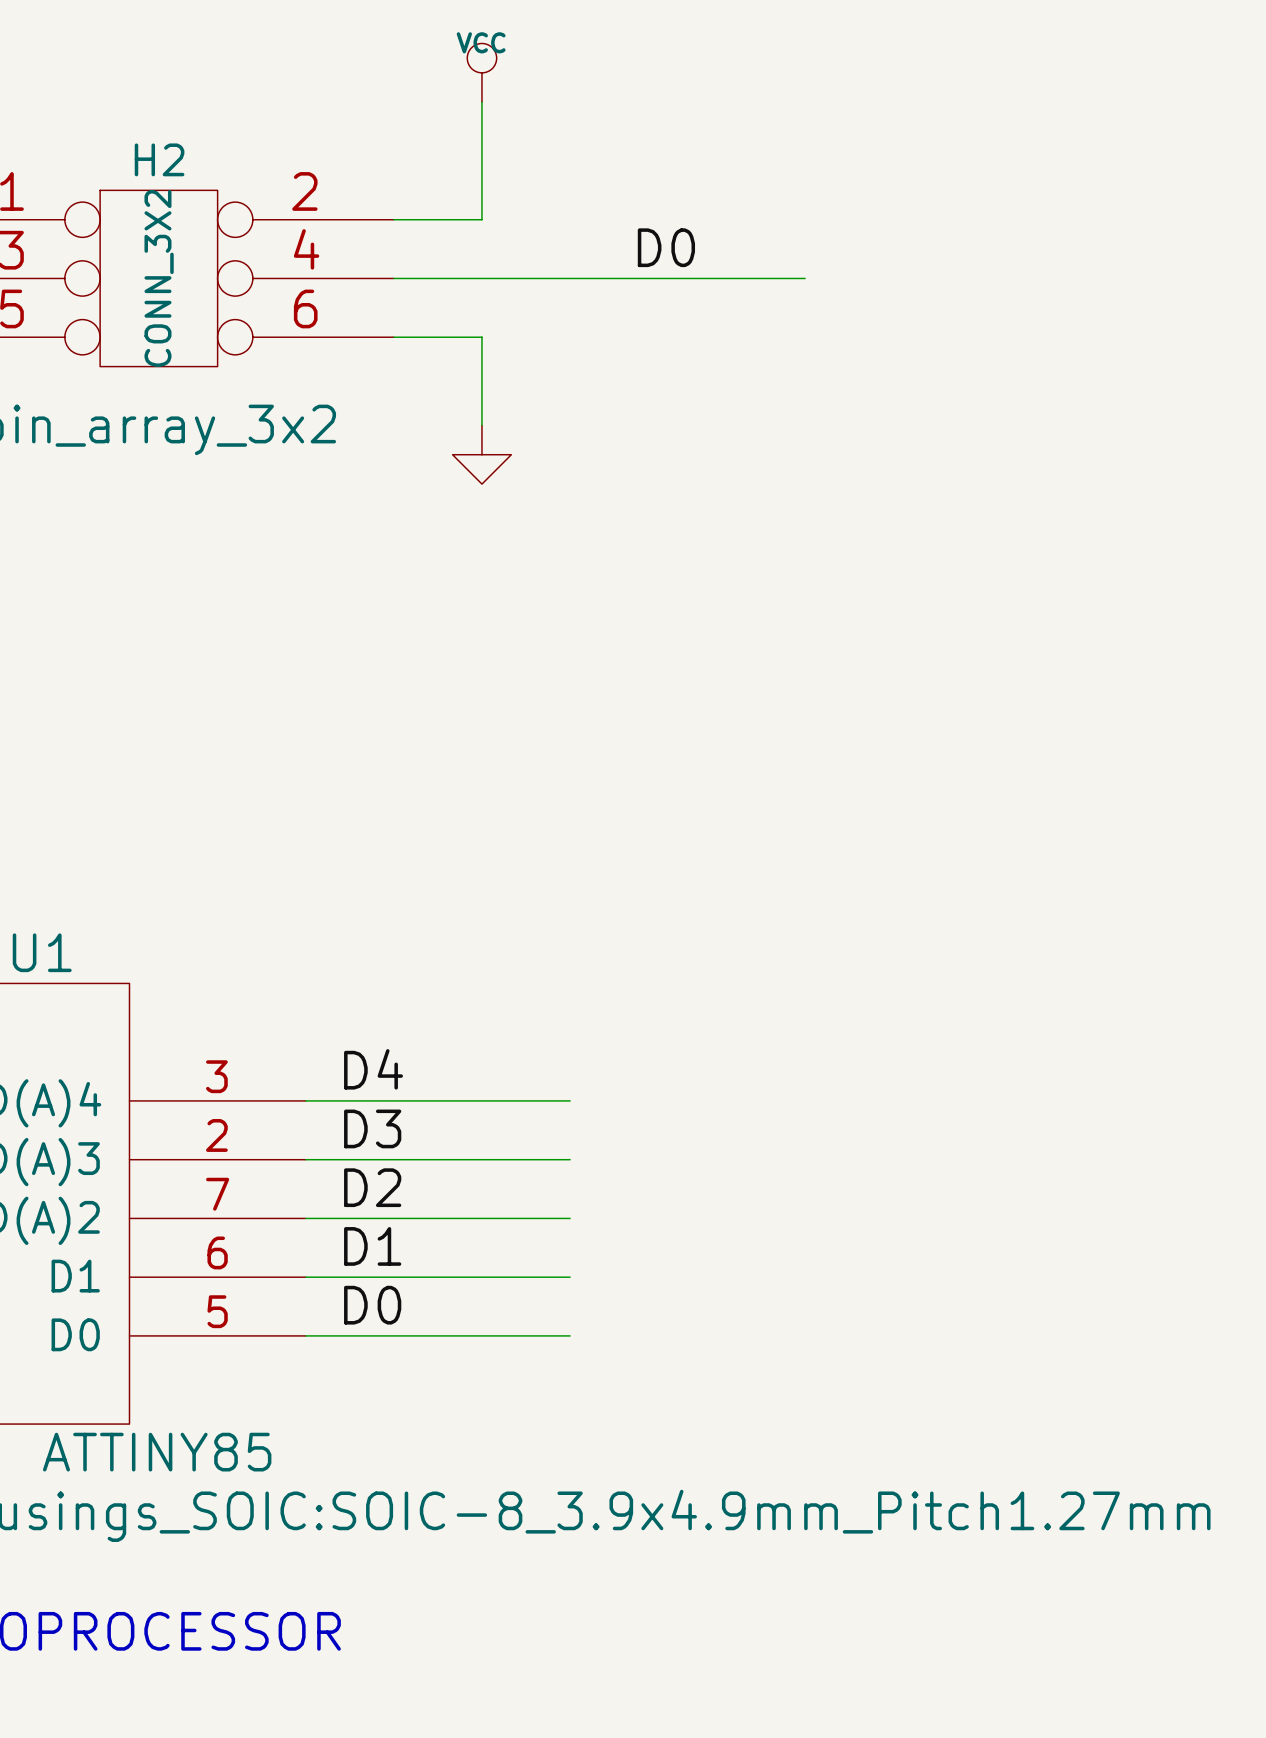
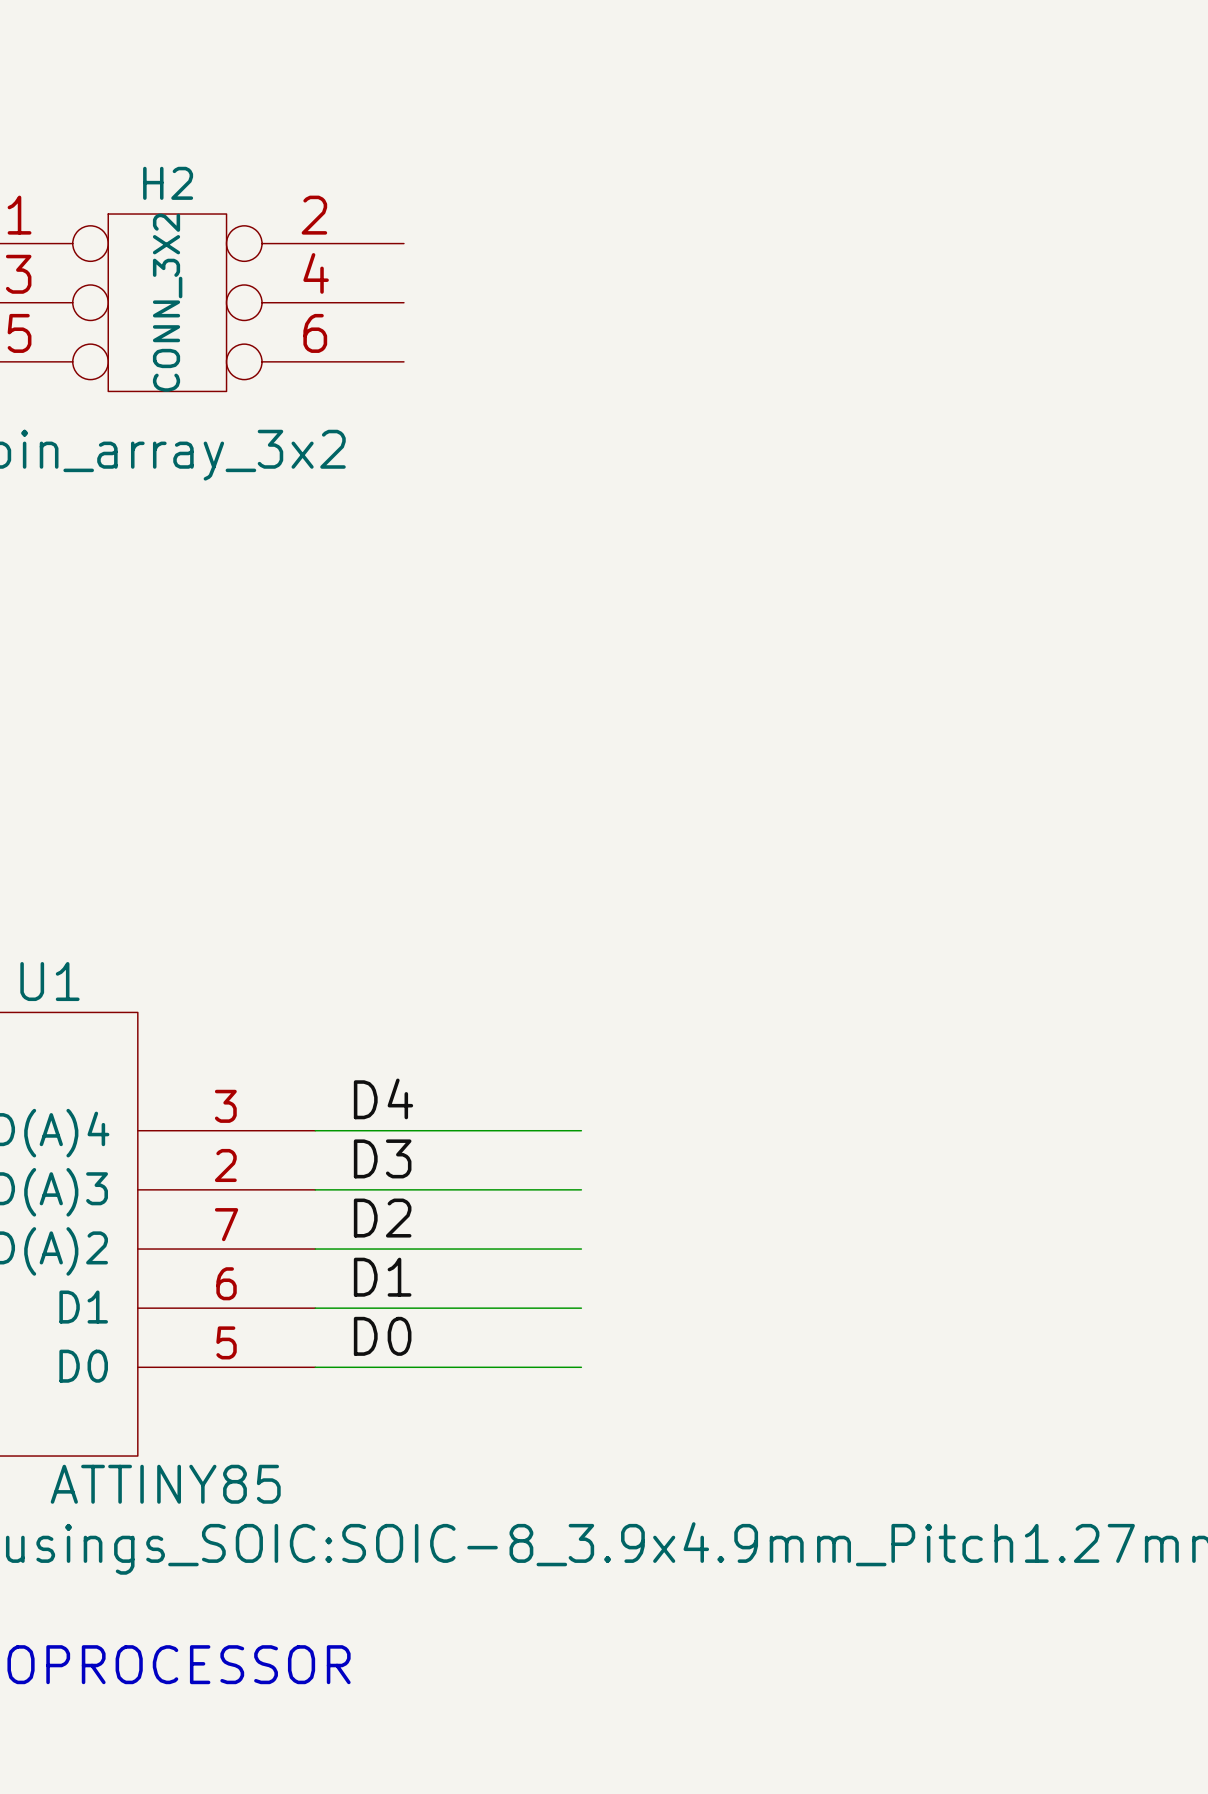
power symbol: VCC (481, 72) -> none
wire: (481, 102) (481, 219) (393, 219) -> none
label: D0 (666, 247) -> none
wire: (393, 278) (805, 278) -> none
wire: (393, 337) (481, 337) (481, 425) -> none
power symbol: (481, 454) -> none

